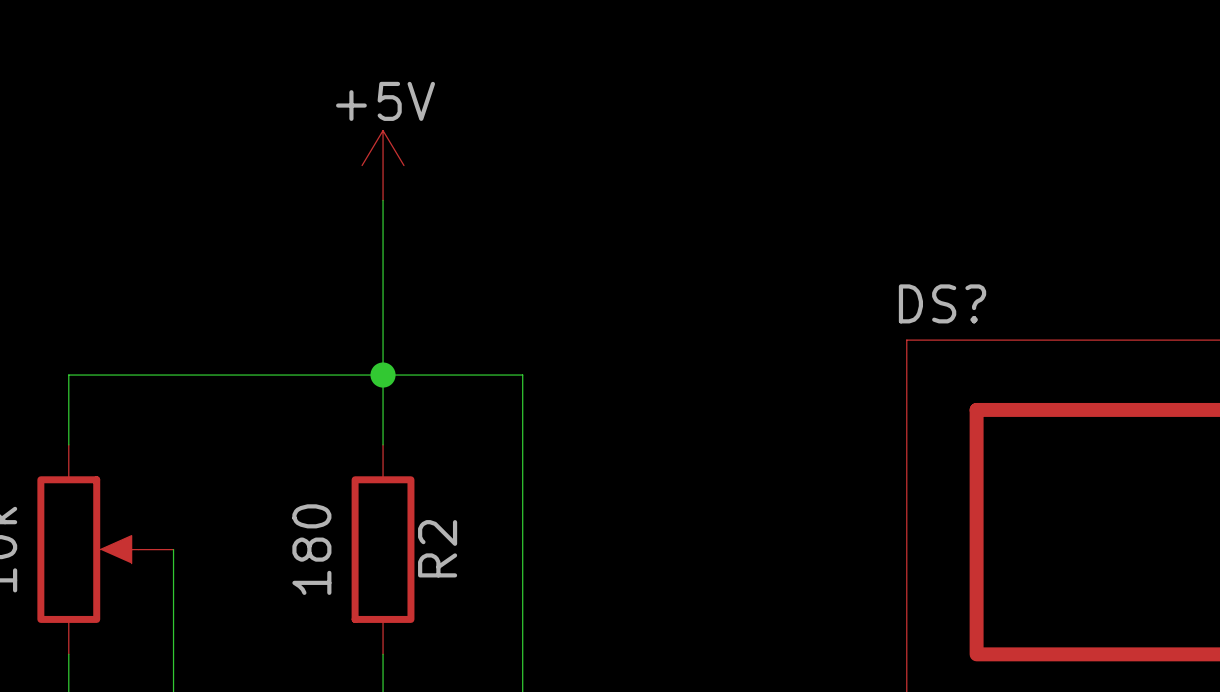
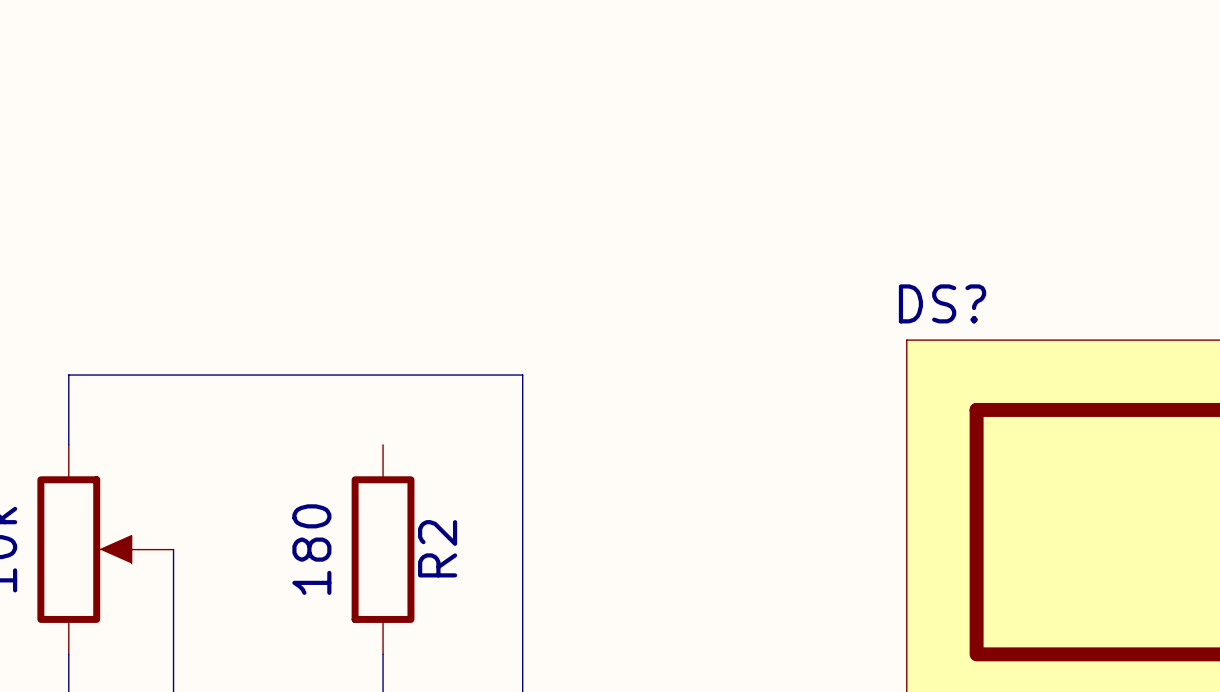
power symbol: +5V (383, 165) -> none
wire: (383, 200) (383, 444) -> none
junction: (383, 375) -> none

